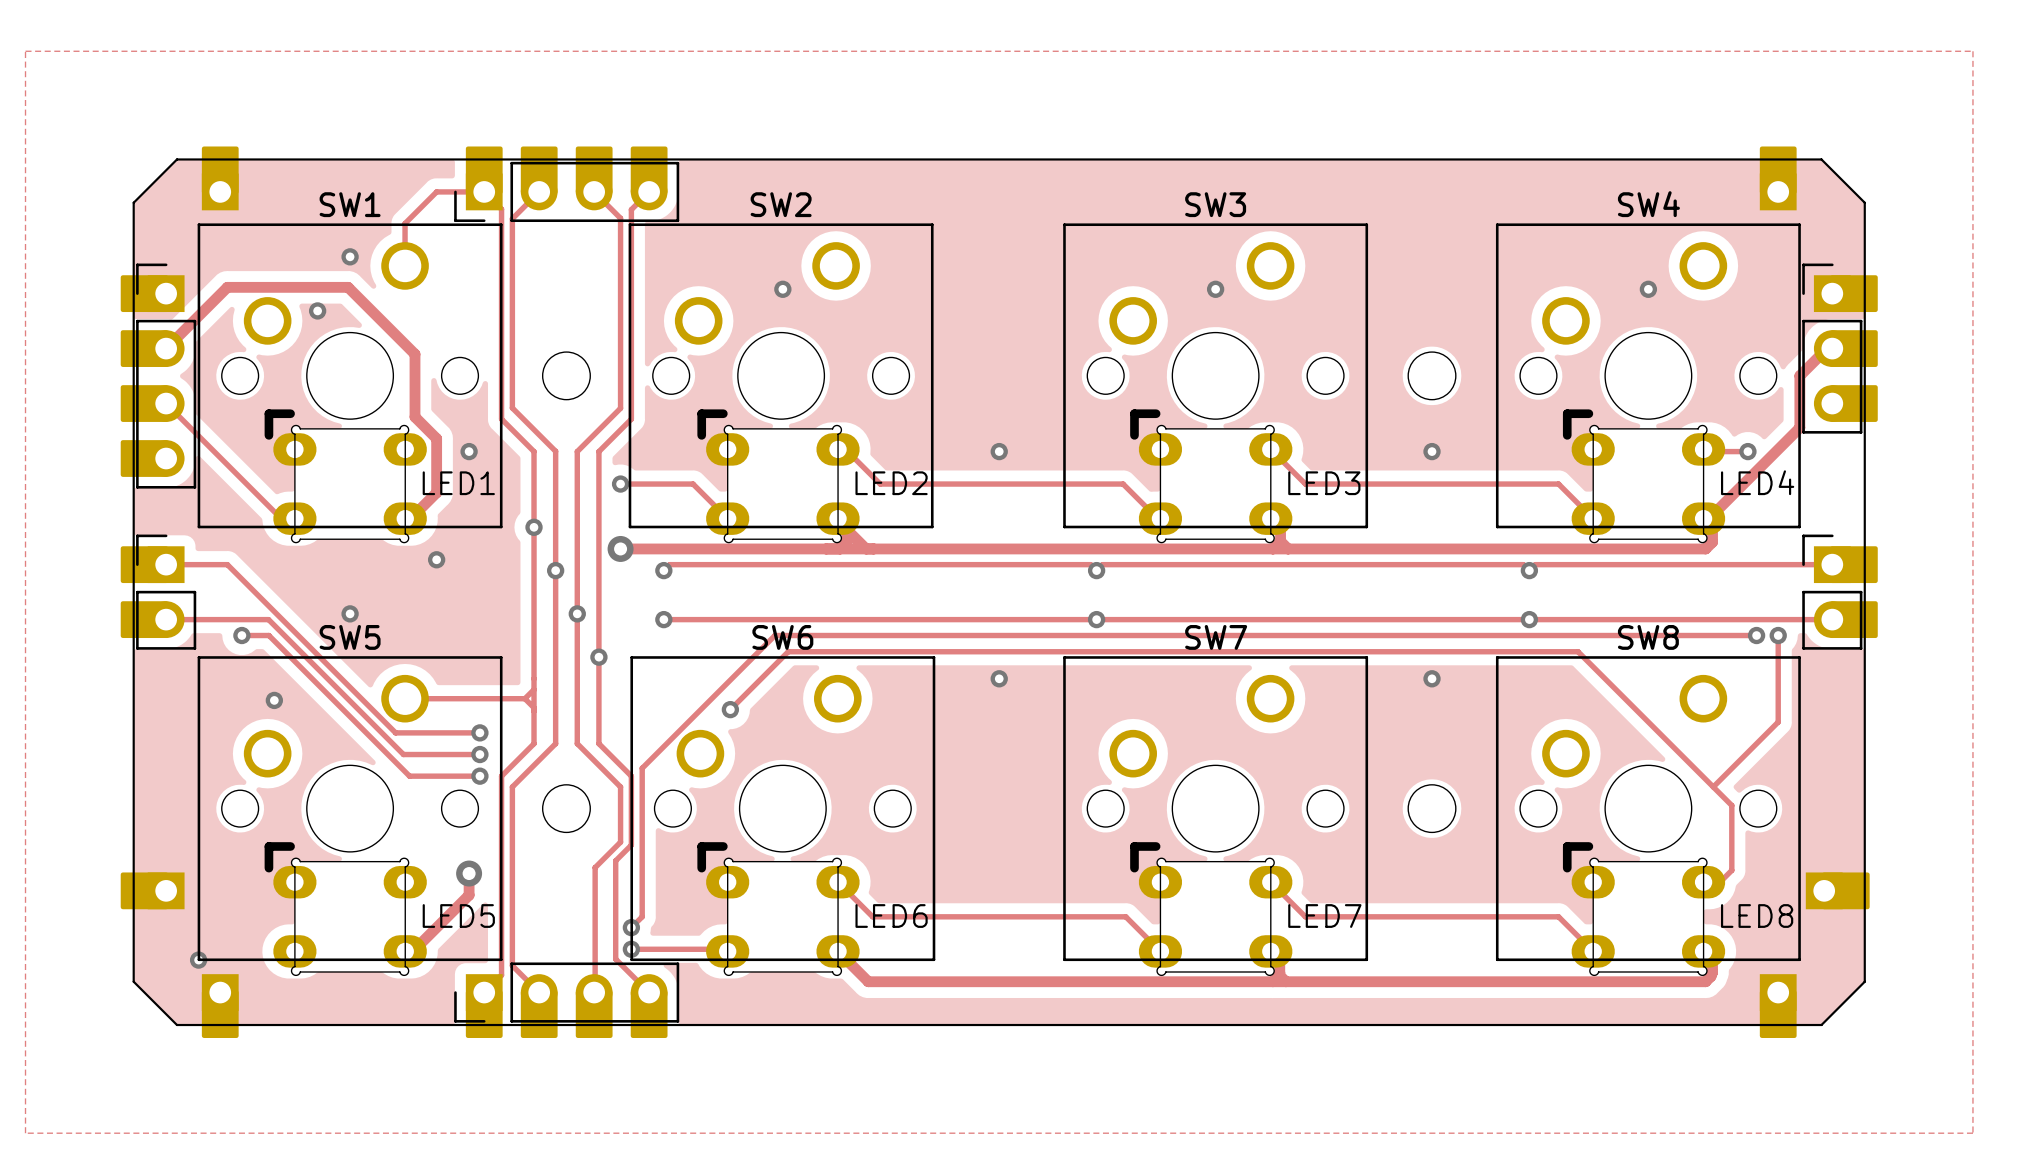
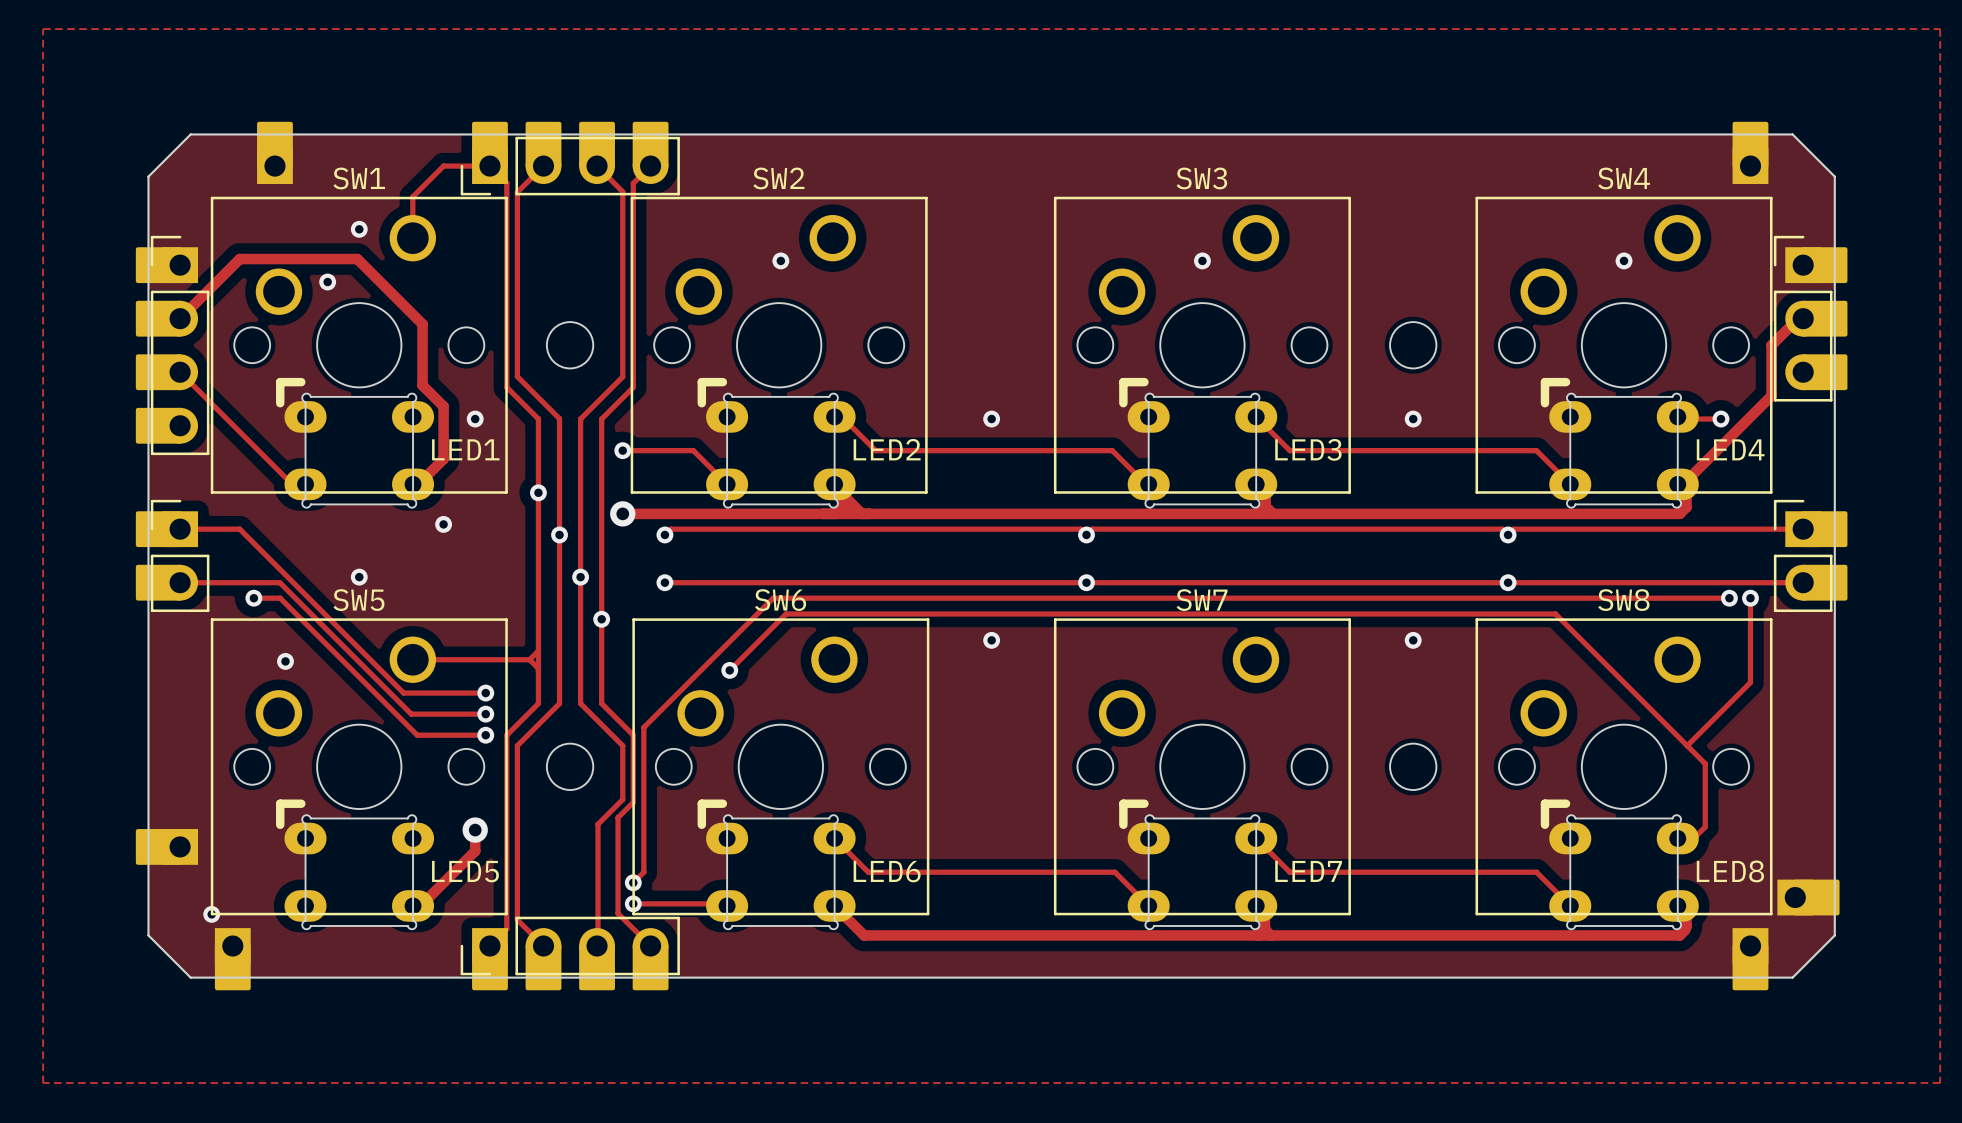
part position: (220, 178) -> (274, 152)
part position: (1837, 890) -> (1808, 897)

